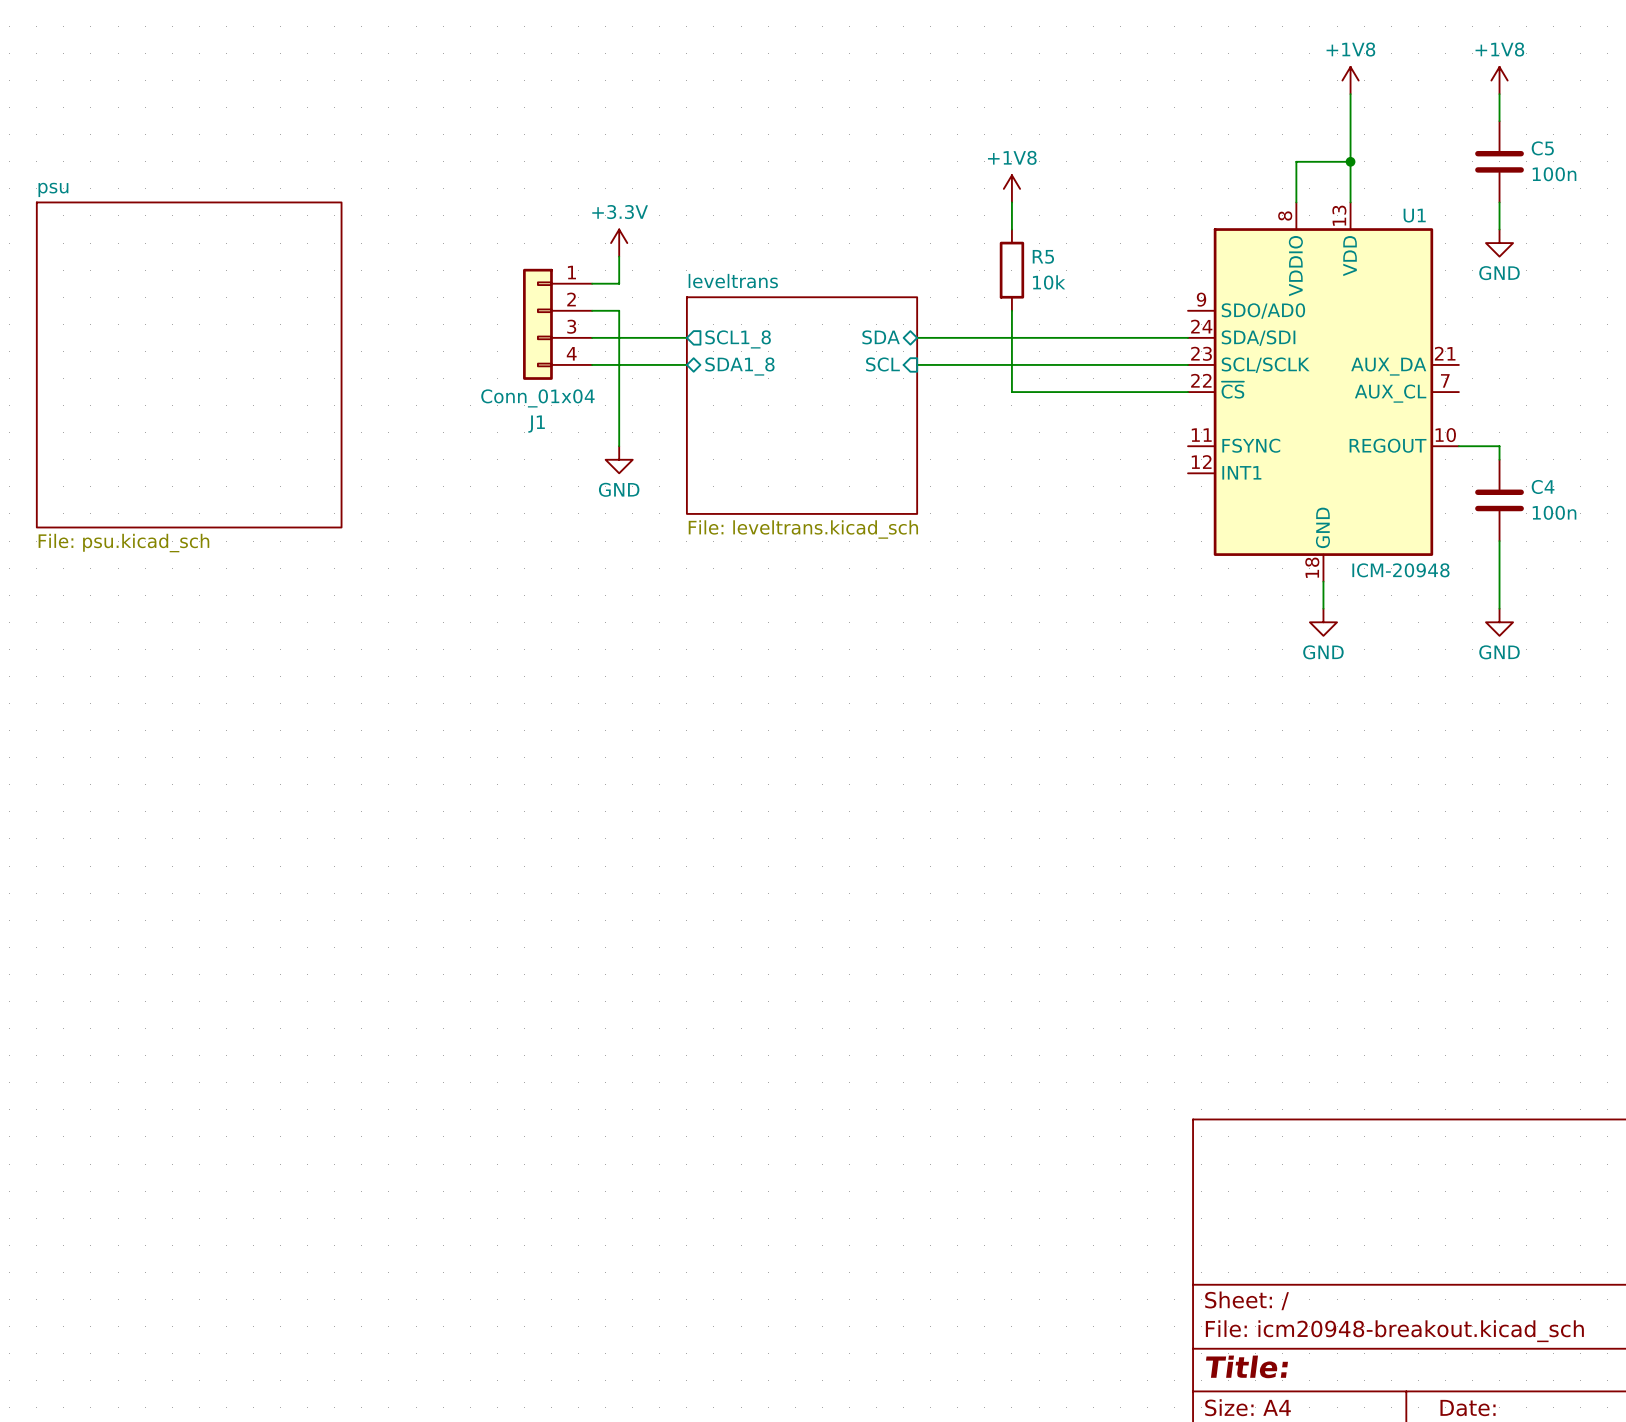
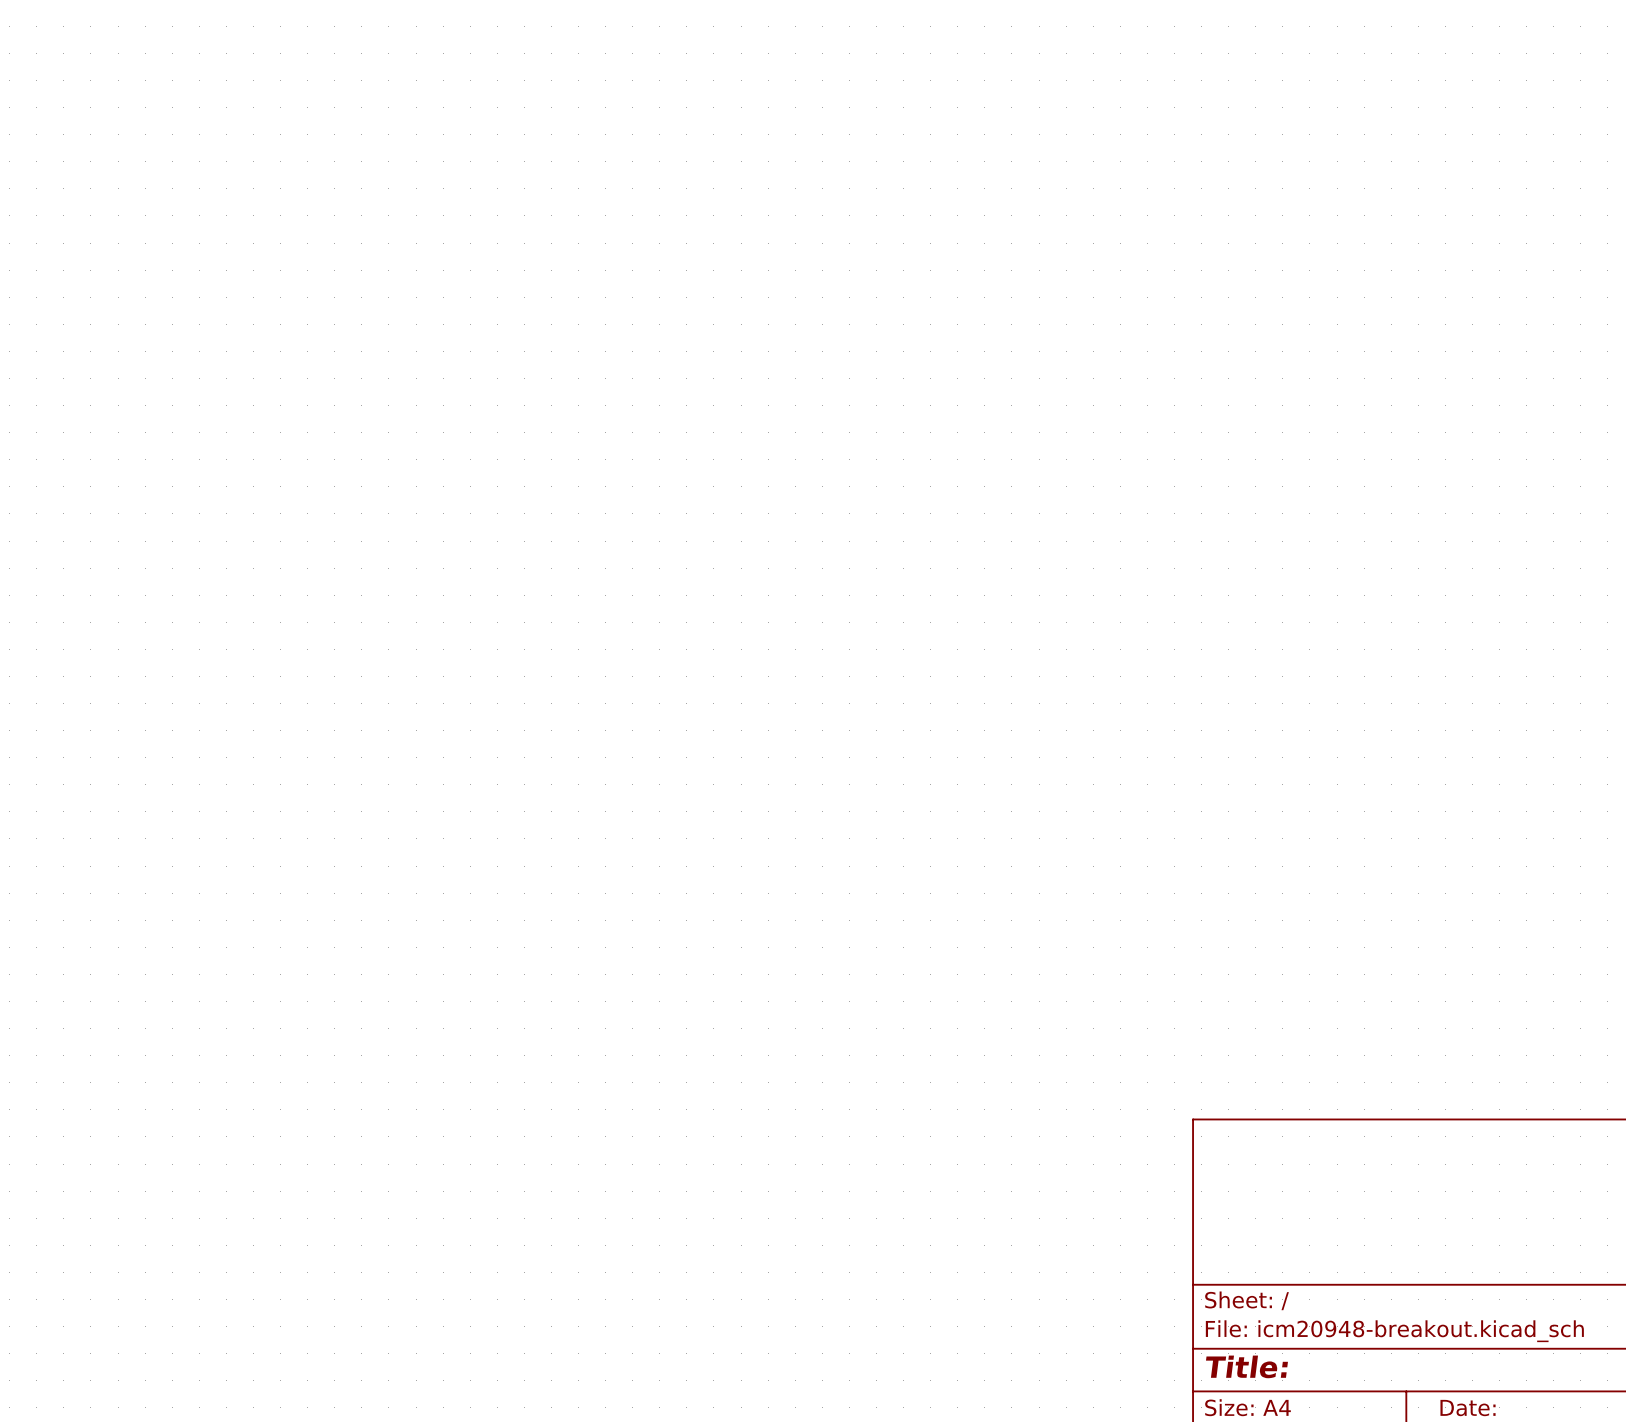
power symbol: +1V8 (1350, 80) -> none
power symbol: +1V8 (1499, 80) -> none
wire: (1350, 94) (1350, 202) -> none
wire: (1499, 94) (1499, 121) -> none
wire: (1350, 161) (1296, 161) (1296, 202) -> none
junction: (1350, 161) -> none
C5: 100n (1499, 161) -> none
power symbol: +1V8 (1011, 188) -> none
wire: (1011, 202) (1011, 229) -> none
wire: (1499, 202) (1499, 229) -> none
power symbol: +3.3V (619, 243) -> none
power symbol: GND (1499, 243) -> none
wire: (619, 256) (619, 283) (592, 283) -> none
R5: 10k (1011, 270) -> none
wire: (592, 310) (619, 310) (619, 446) -> none
wire: (1011, 310) (1011, 392) (1188, 392) -> none
J1: Conn_01x04 (557, 324) -> none
wire: (592, 337) (686, 337) -> none
sheet pin: SDA (881, 337) -> none
wire: (917, 337) (1188, 337) -> none
sheet pin: SCL1_8 (738, 339) -> none
sheet psu: File: psu.kicad_sch (189, 364) -> none
wire: (592, 364) (686, 364) -> none
sheet pin: SCL (882, 364) -> none
wire: (917, 364) (1188, 364) -> none
sheet pin: SDA1_8 (739, 366) -> none
U1: ICM-20948 (1323, 392) -> none
sheet leveltrans: File: leveltrans.kicad_sch (802, 405) -> none
wire: (1458, 446) (1499, 446) (1499, 459) -> none
power symbol: GND (619, 459) -> none
C4: 100n (1499, 500) -> none
wire: (1499, 541) (1499, 608) -> none
wire: (1323, 581) (1323, 608) -> none
power symbol: GND (1323, 622) -> none
power symbol: GND (1499, 622) -> none

